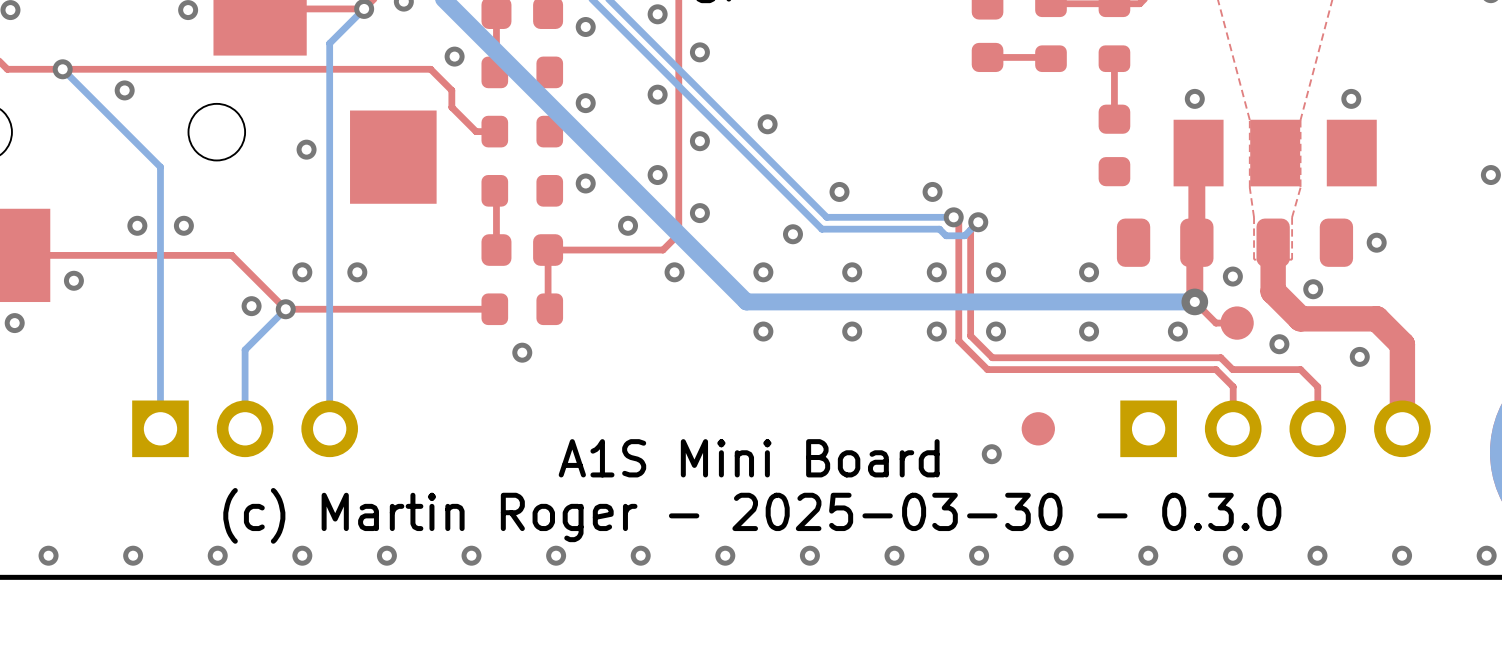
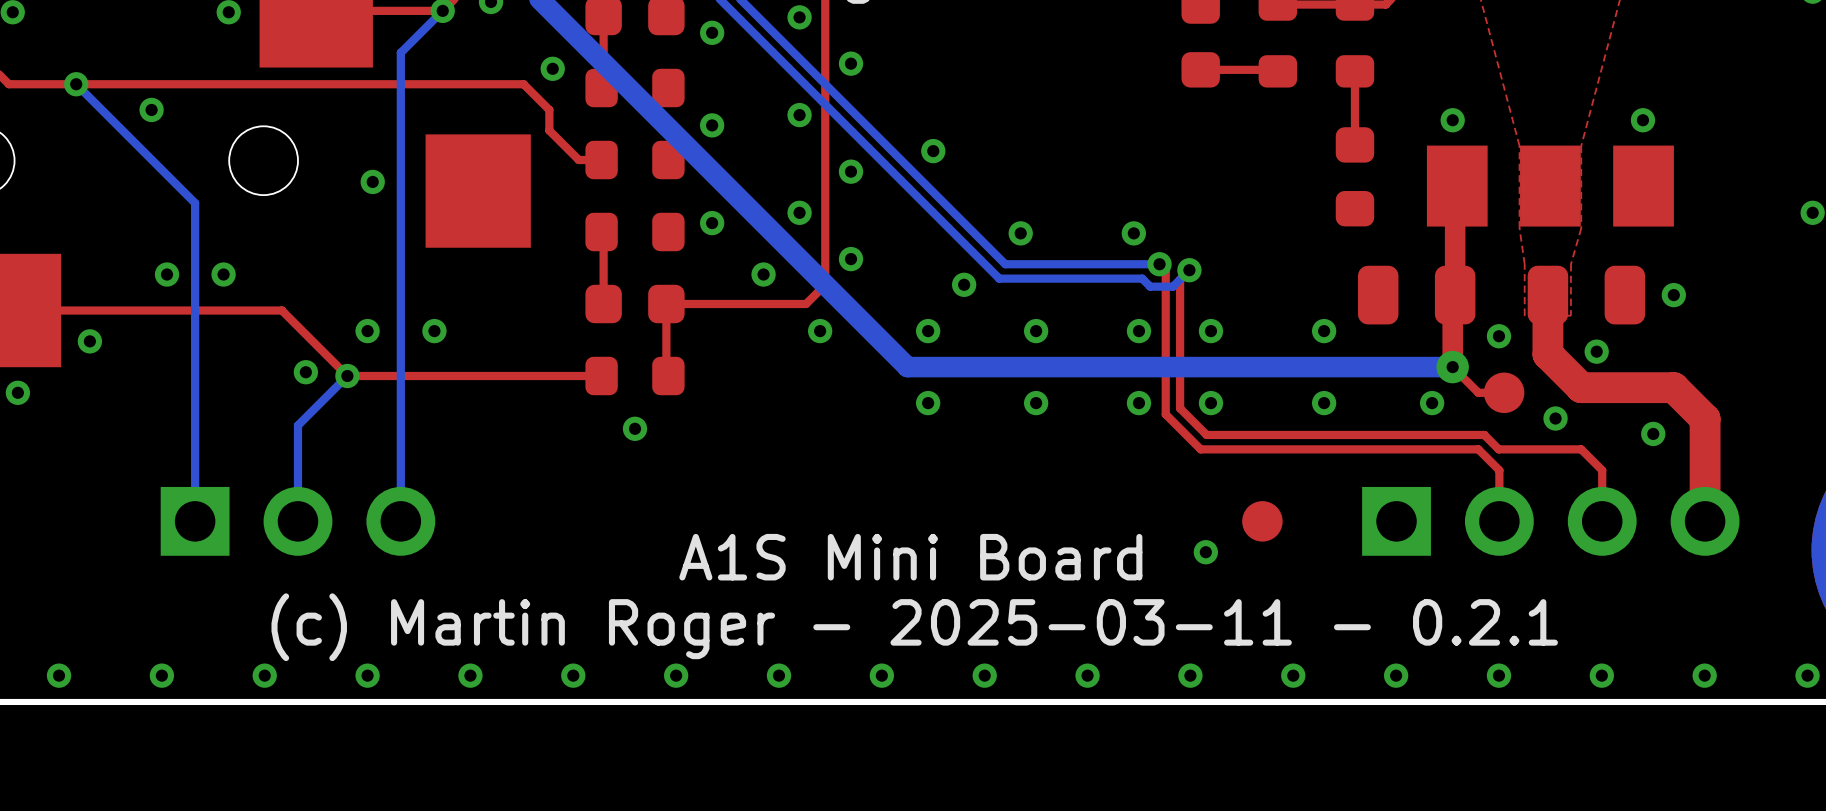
text: (c) Martin Roger - 2025-03-30 - 0.3.0 (752, 515) -> (c) Martin Roger - 2025-03-11 - 0.2.1 (914, 627)

